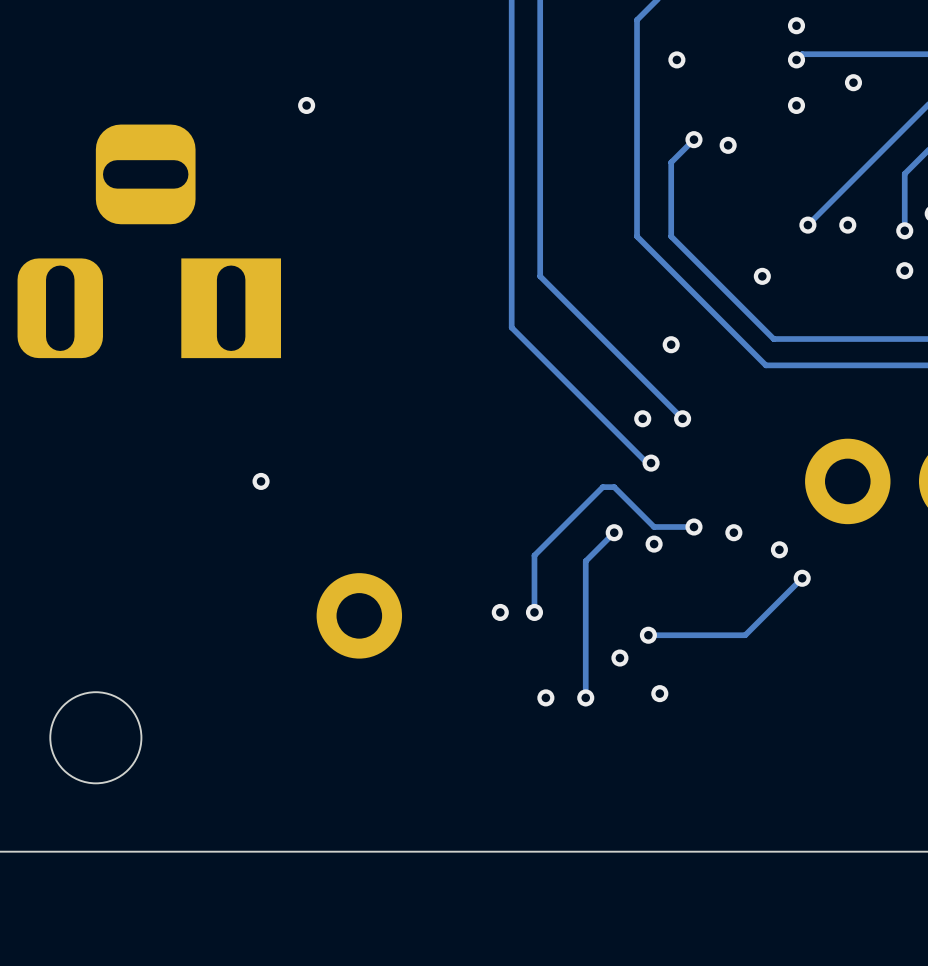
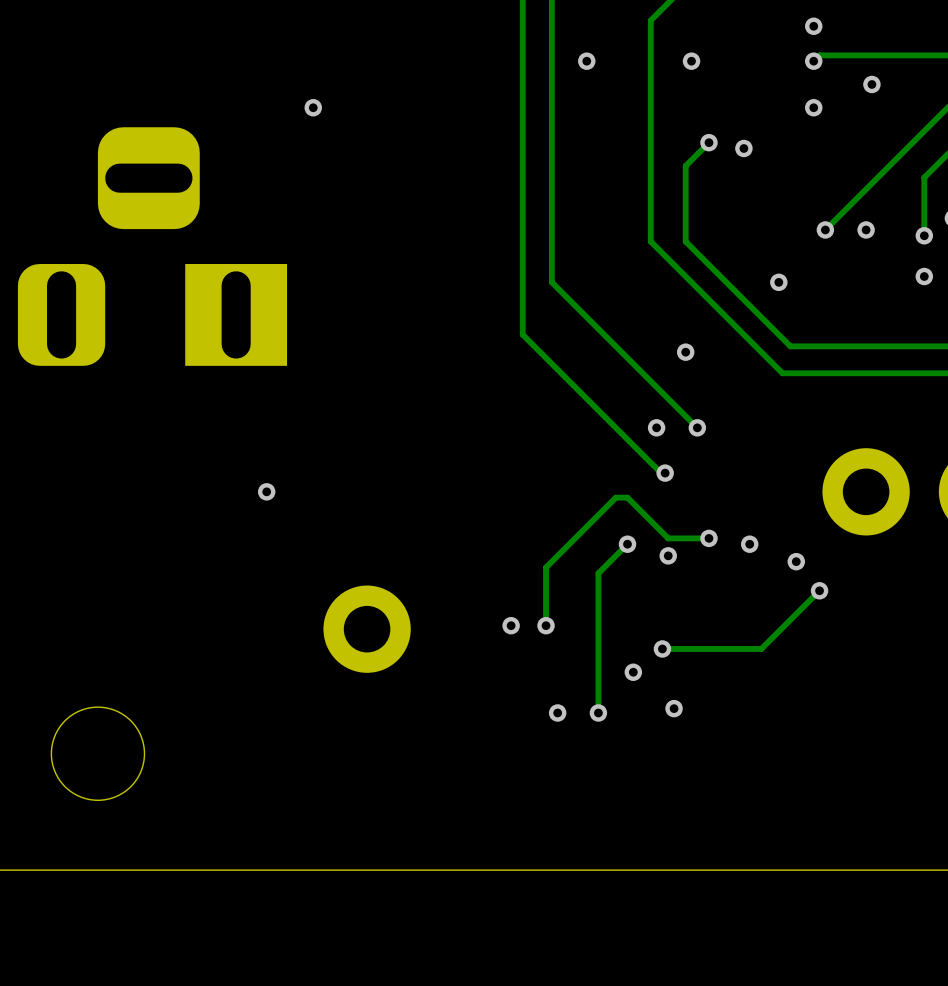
via: none -> (586, 61)

